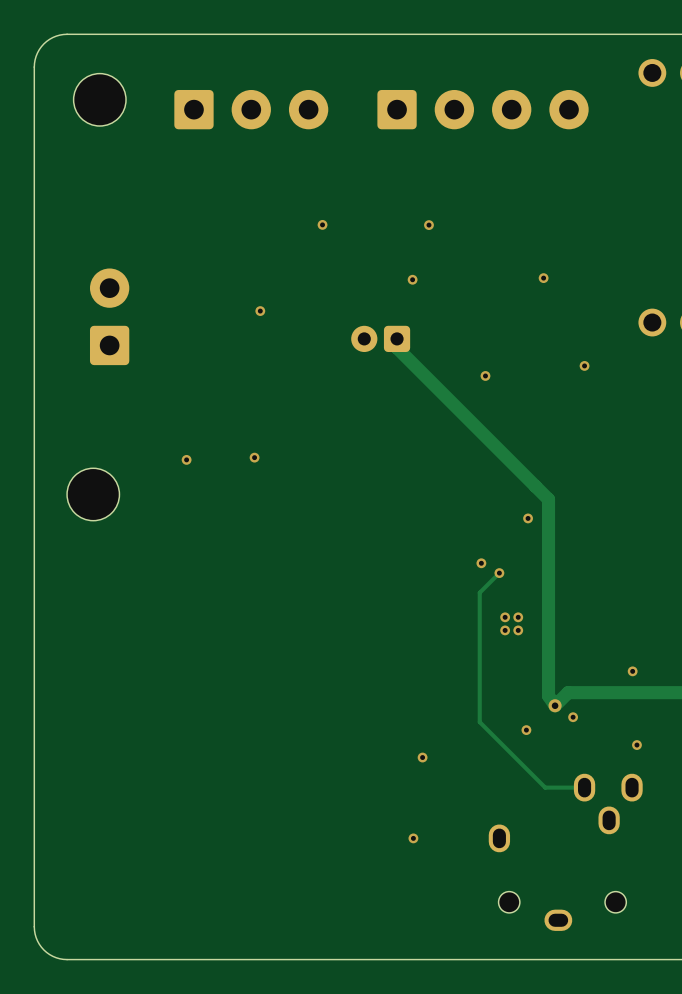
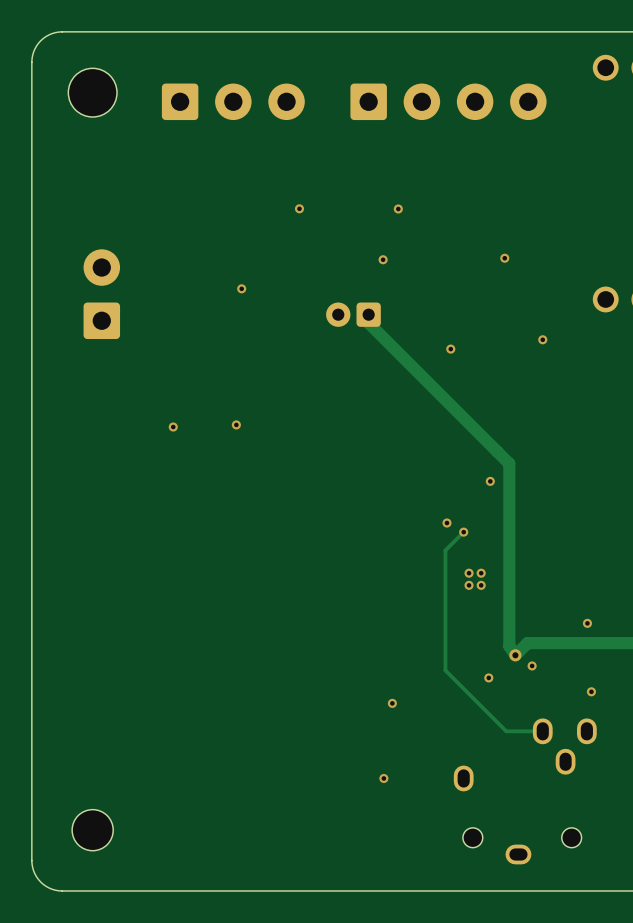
part: (93, 494) -> none
part: none -> (92, 830)

